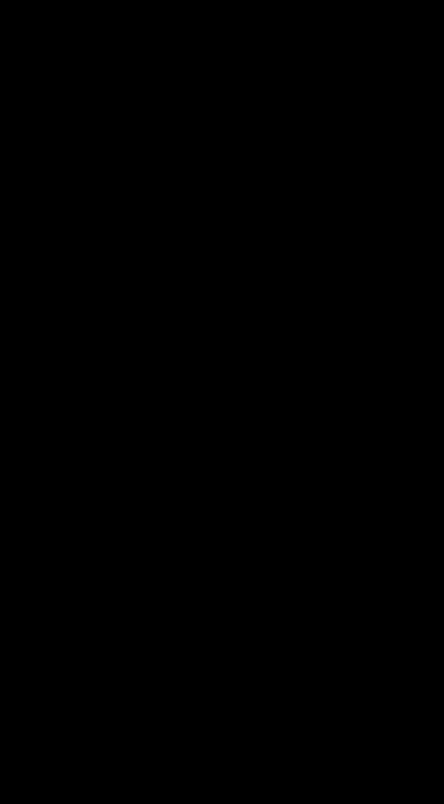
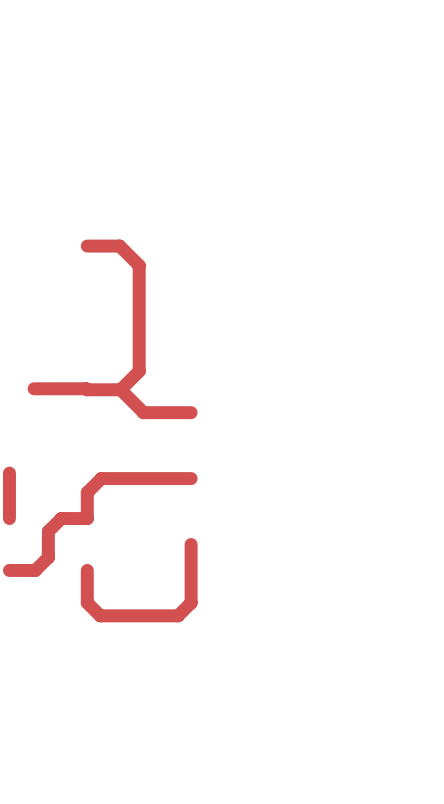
top track: none -> (87, 246) (119, 246) (139, 265) (139, 371) (120, 389)
top track: none -> (34, 388) (120, 389)
top track: none -> (120, 389) (143, 412) (191, 412)
top track: none -> (9, 473) (9, 518)
top track: none -> (191, 478) (101, 478) (87, 492) (87, 518) (61, 518) (48, 531) (48, 557) (35, 570) (9, 570)
top track: none -> (191, 544) (191, 602) (178, 615) (100, 615) (87, 602) (87, 570)

